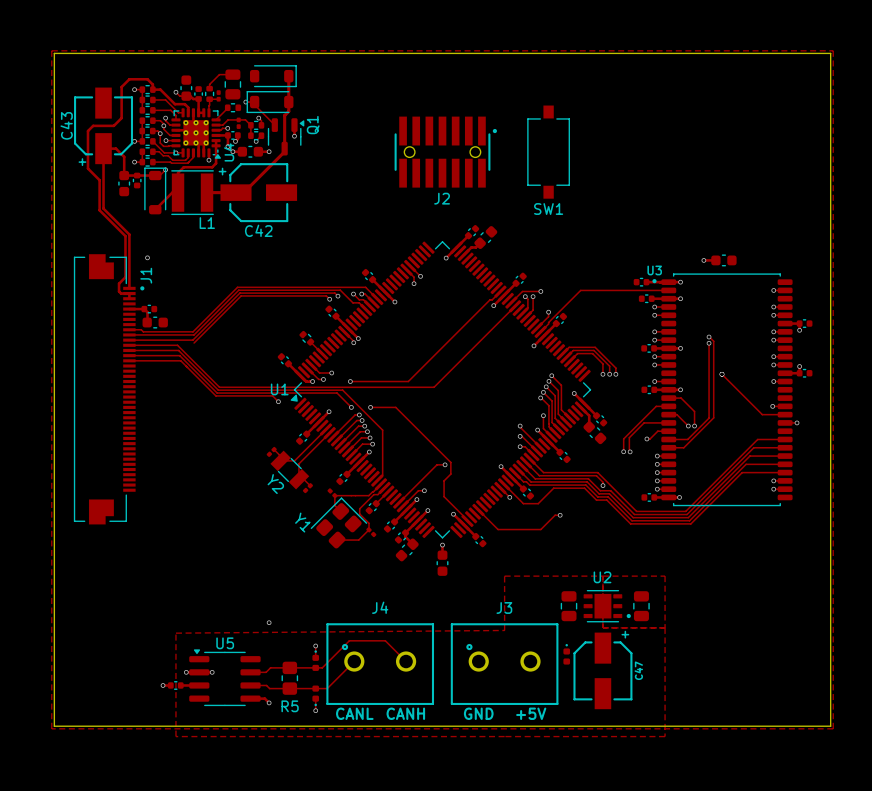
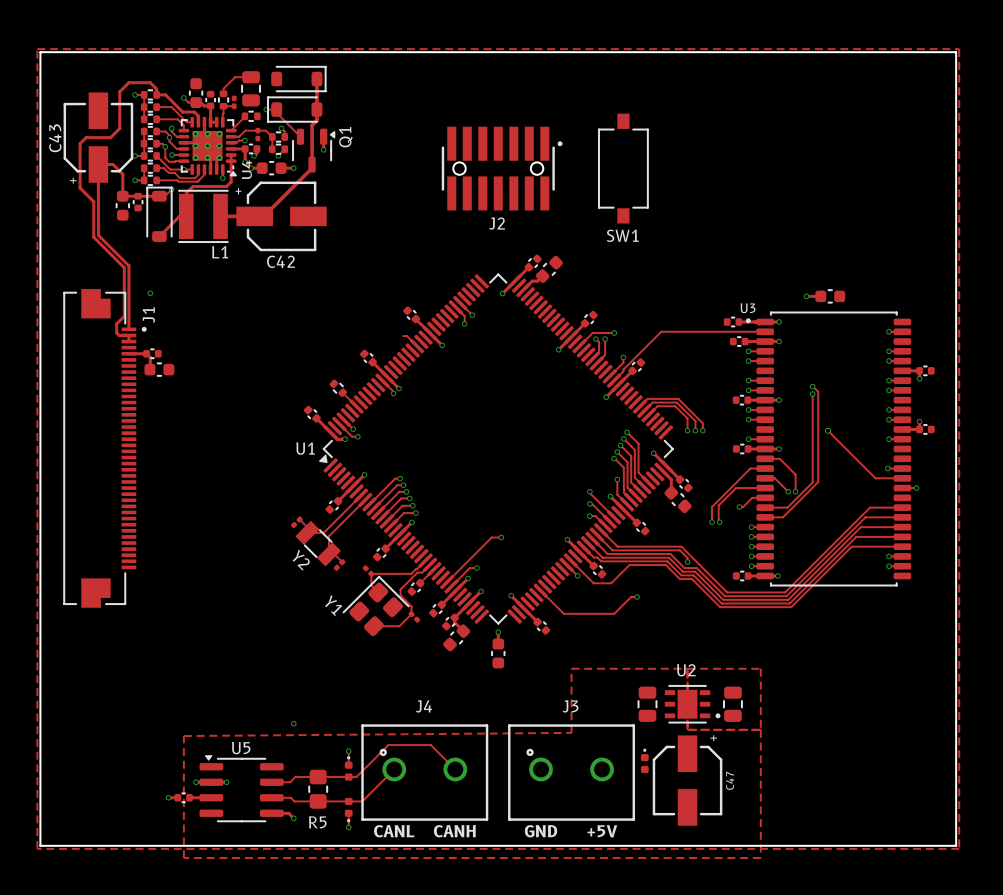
track: (500, 291) (408, 381) (350, 381) -> none
track: (353, 294) (369, 306) -> none
via: (353, 294) -> none
via: (361, 294) -> none
track: (337, 296) (334, 293) (239, 293) (192, 340) (129, 340) -> none
via: (337, 296) -> none
track: (377, 298) (365, 287) (237, 287) (193, 331) (143, 331) (141, 329) (129, 329) -> none
track: (329, 299) (326, 295) (241, 295) (194, 343) -> none
via: (329, 299) -> none
track: (515, 306) (434, 387) (219, 387) (177, 345) (129, 345) -> none
track: (366, 309) (359, 302) (352, 302) (340, 290) (238, 290) (194, 334) (129, 334) -> none
track: (129, 350) (178, 350) (218, 390) (342, 390) (382, 430) (382, 475) (377, 480) -> none
track: (129, 355) (179, 355) (217, 393) (337, 393) (351, 407) -> none
track: (129, 360) (180, 360) (215, 395) (272, 395) (278, 401) -> none
track: (319, 373) (331, 373) -> none
via position: (331, 373) -> (353, 429)
via: (350, 381) -> none
via: (278, 401) -> none
via: (351, 407) -> none
track: (370, 407) (395, 407) (450, 462) (450, 474) (444, 480) (444, 496) (467, 520) -> none
via: (370, 407) -> none

